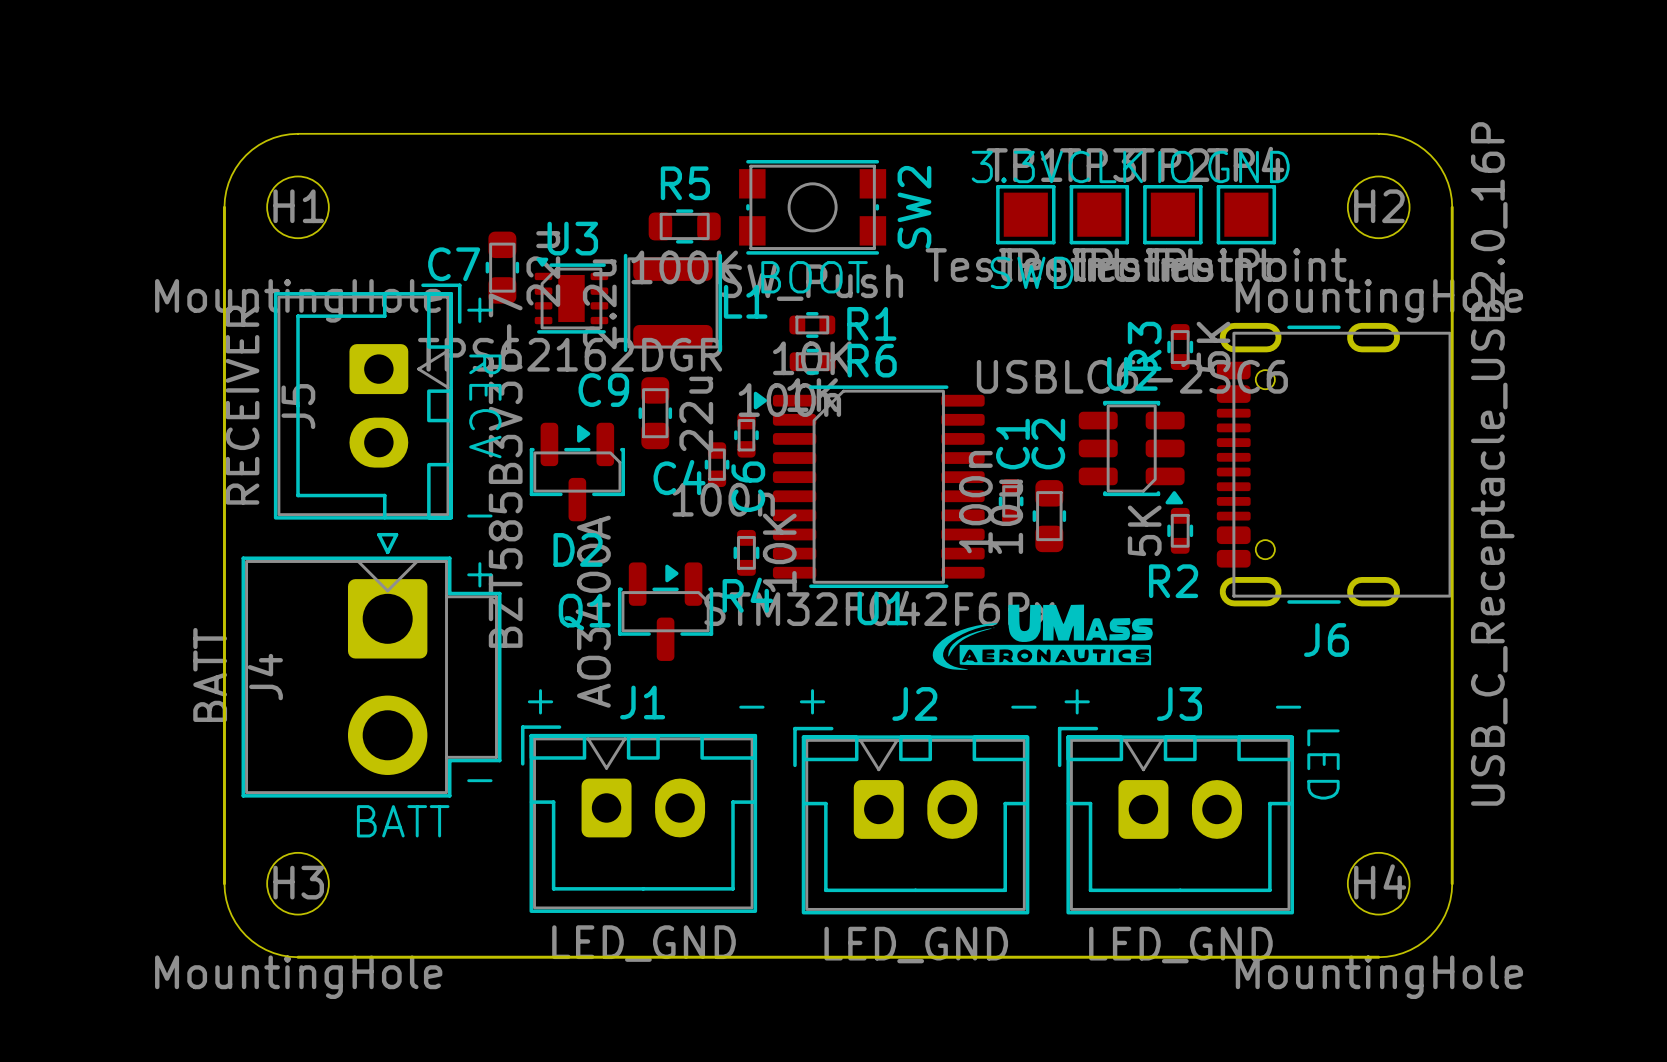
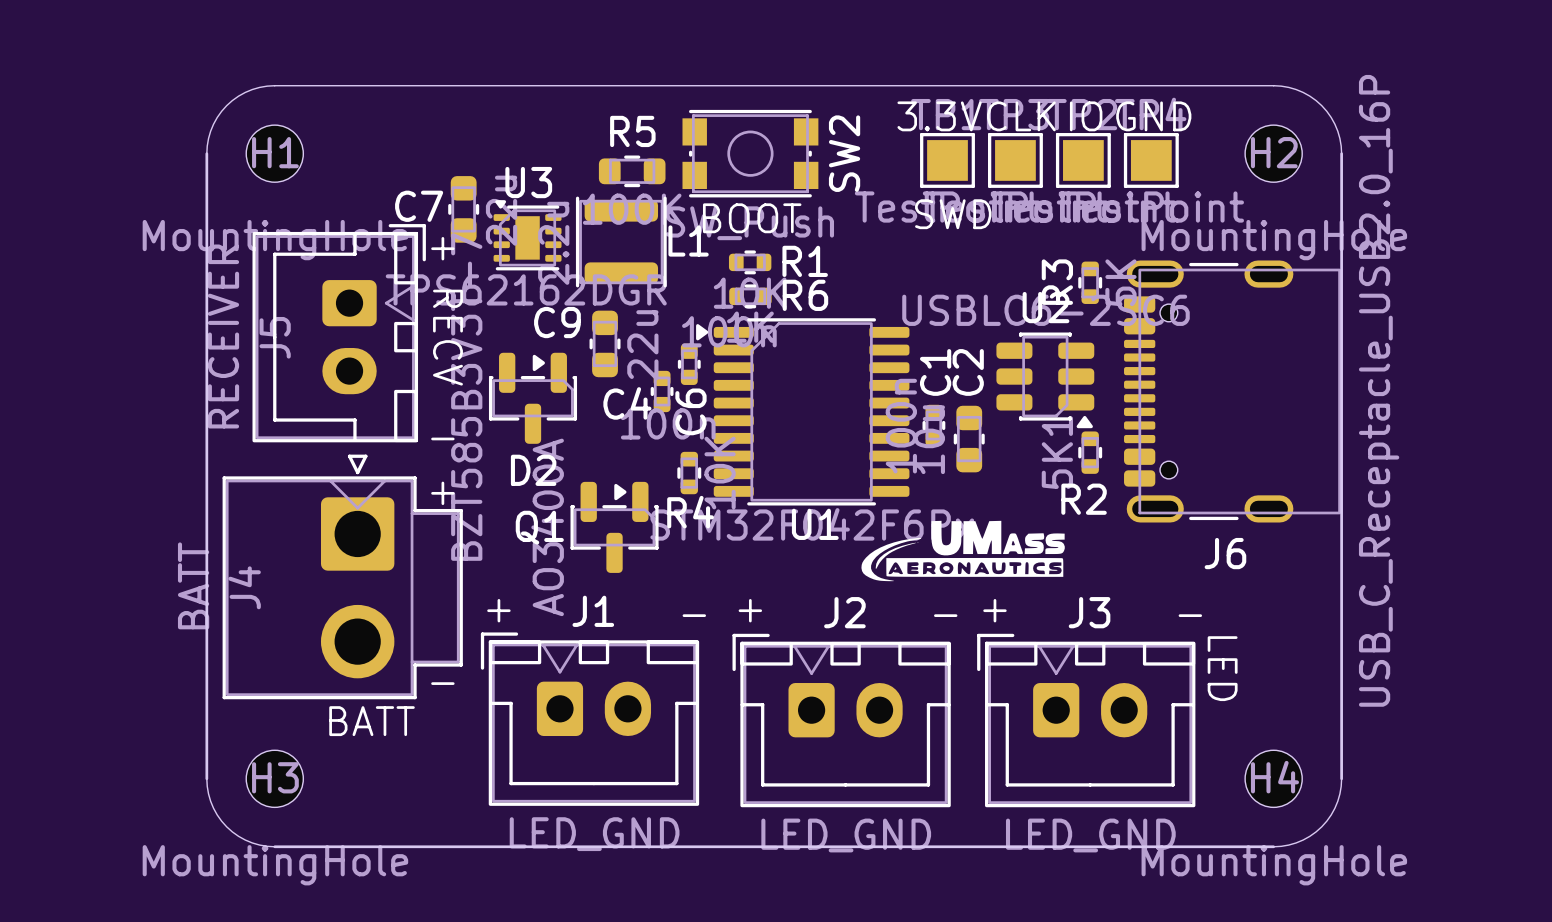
R2 value: 5K (1144, 530) -> 5K1 (1057, 452)

